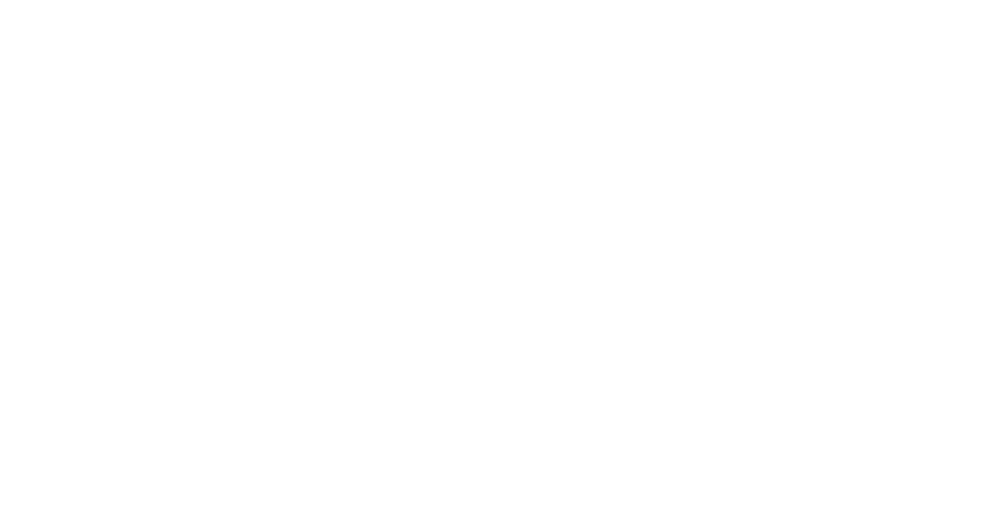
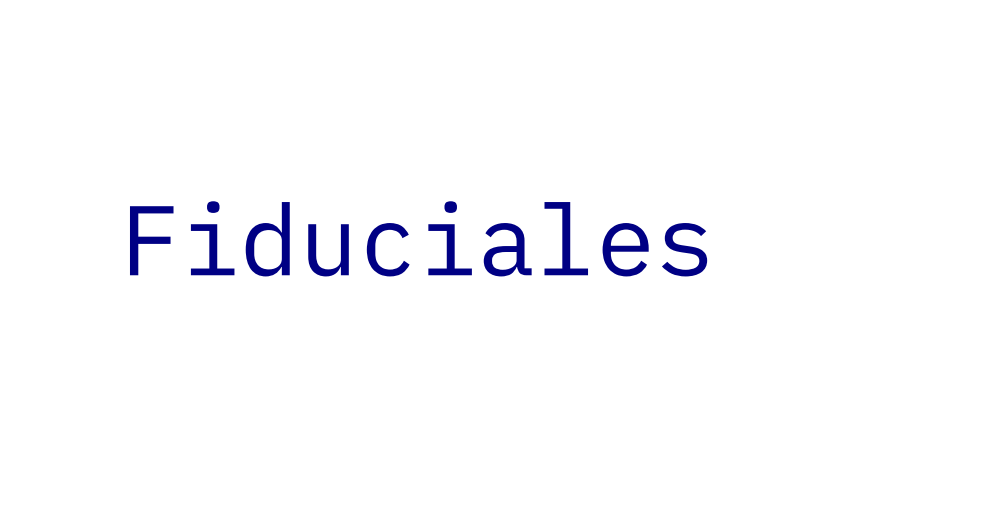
text: none -> Fiduciales (418, 238)

